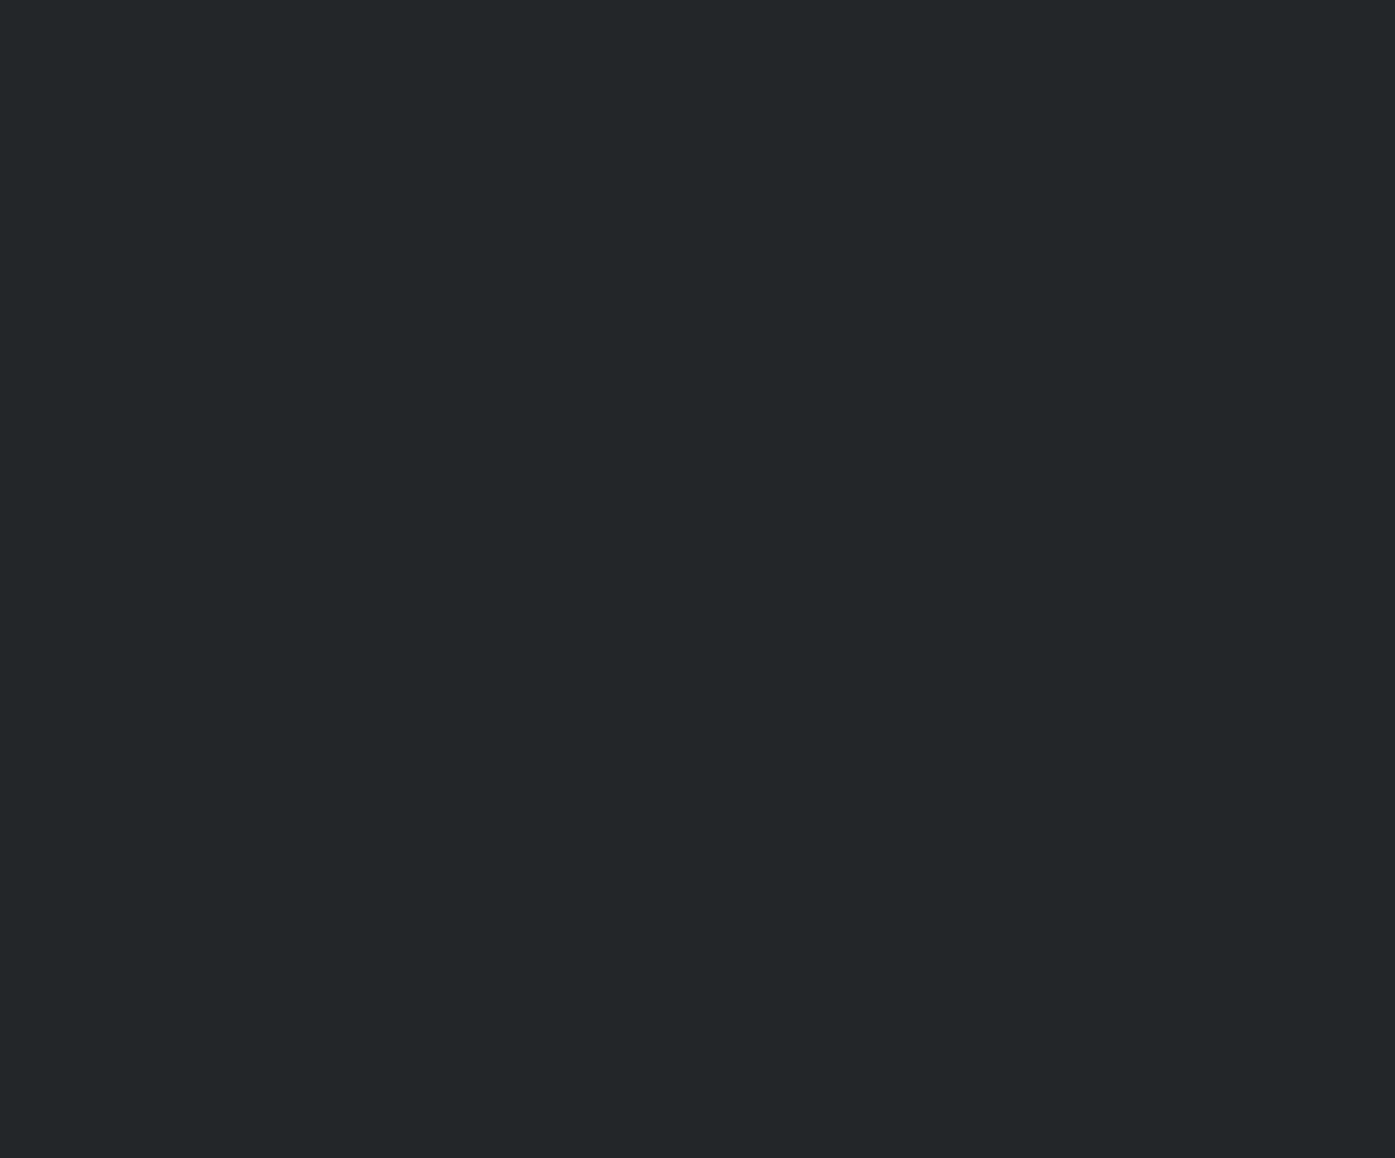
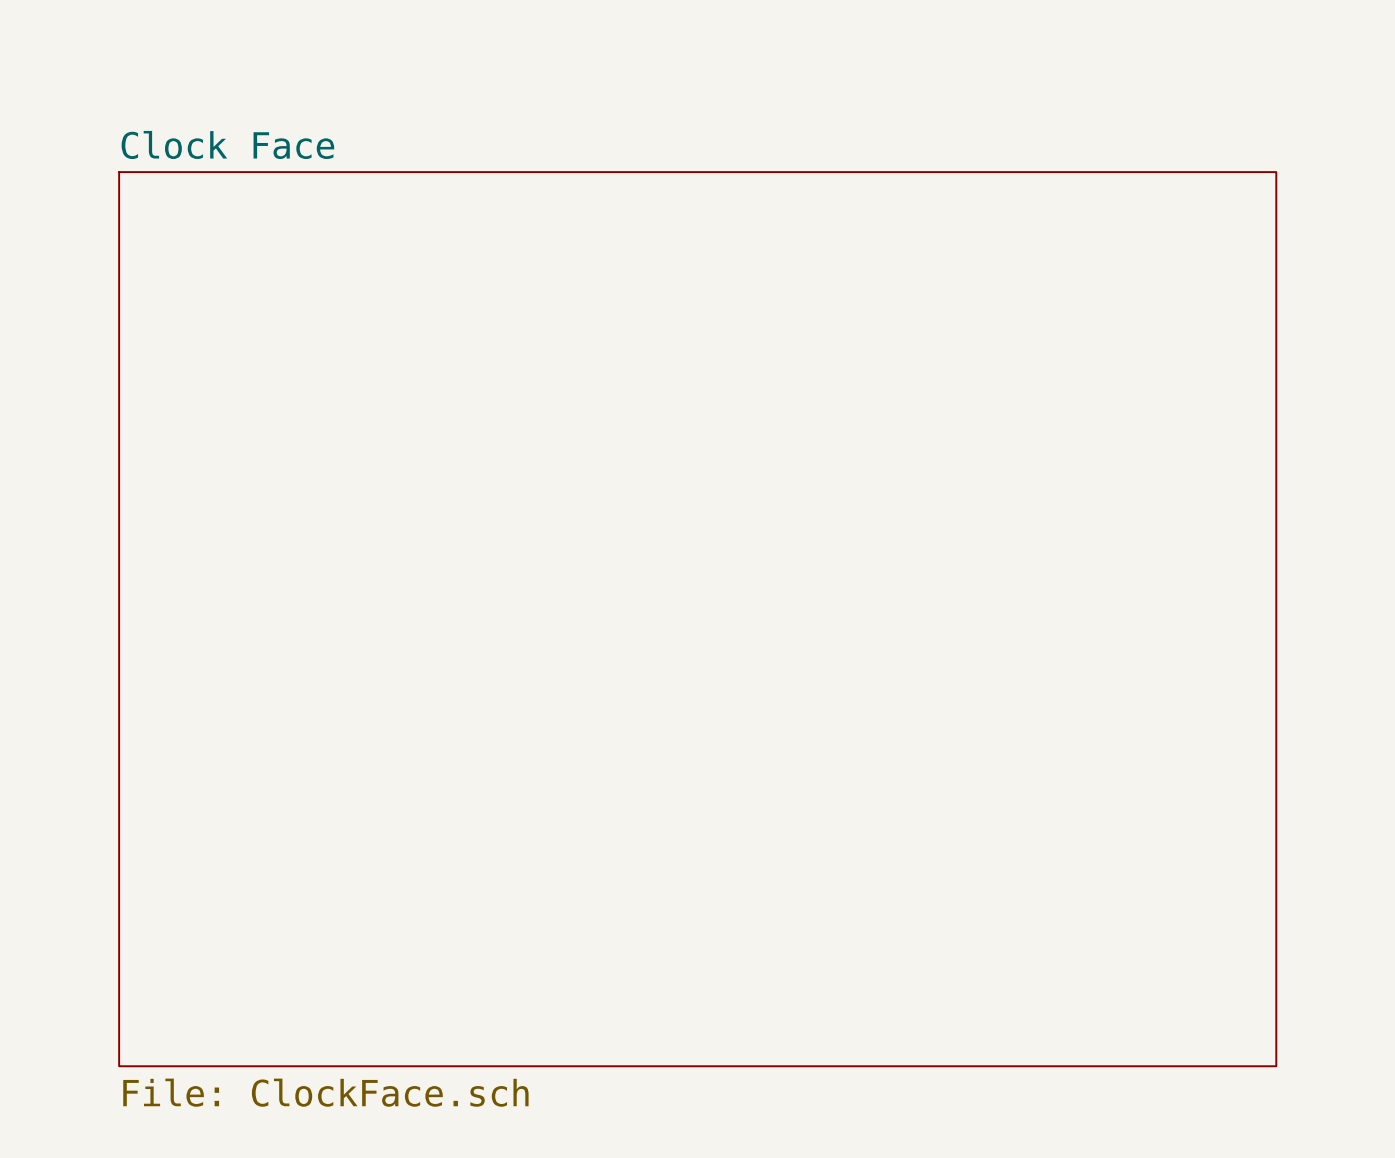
sheet Clock Face: none -> File: ClockFace.sch (697, 619)

